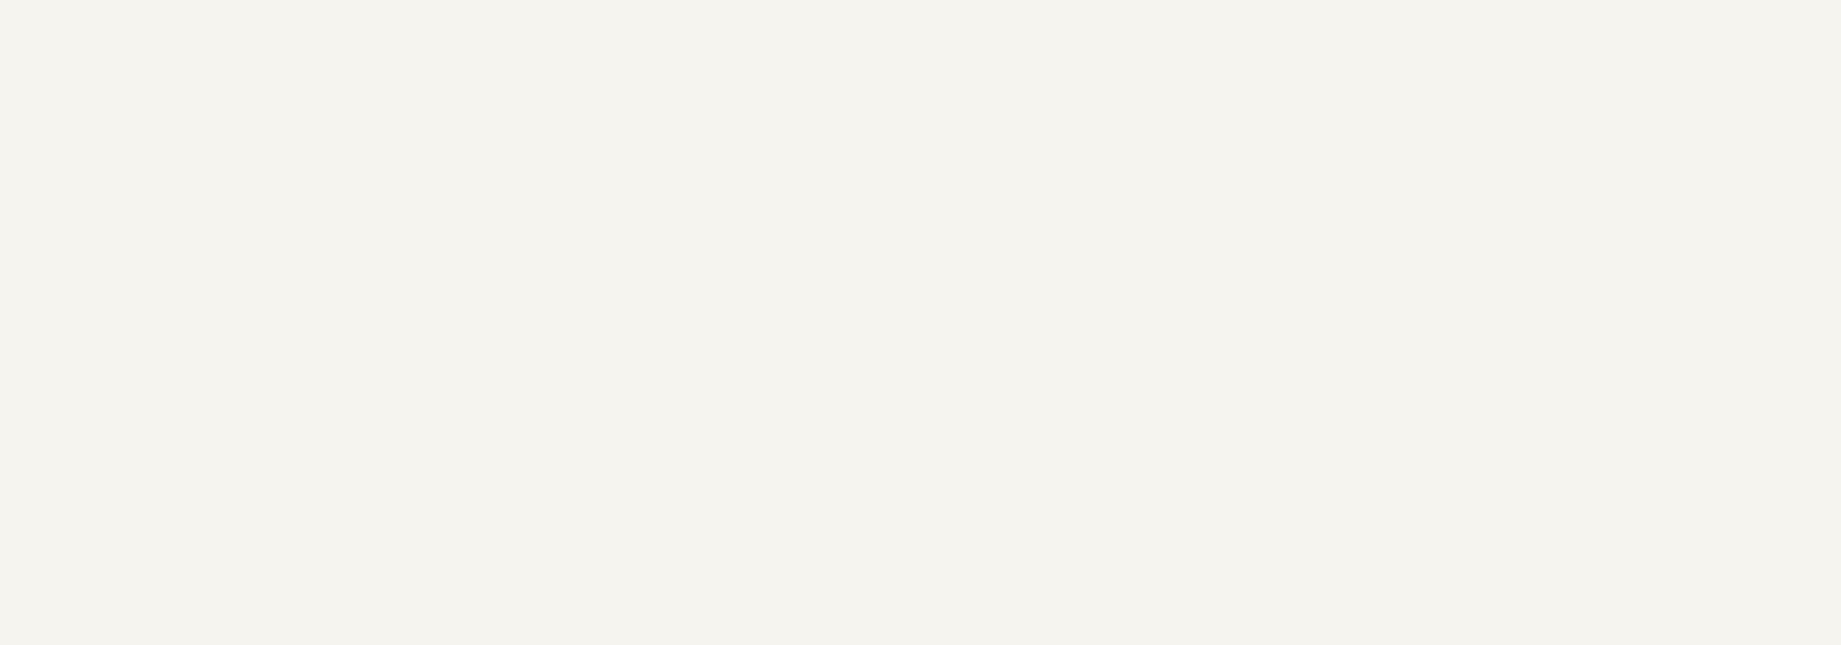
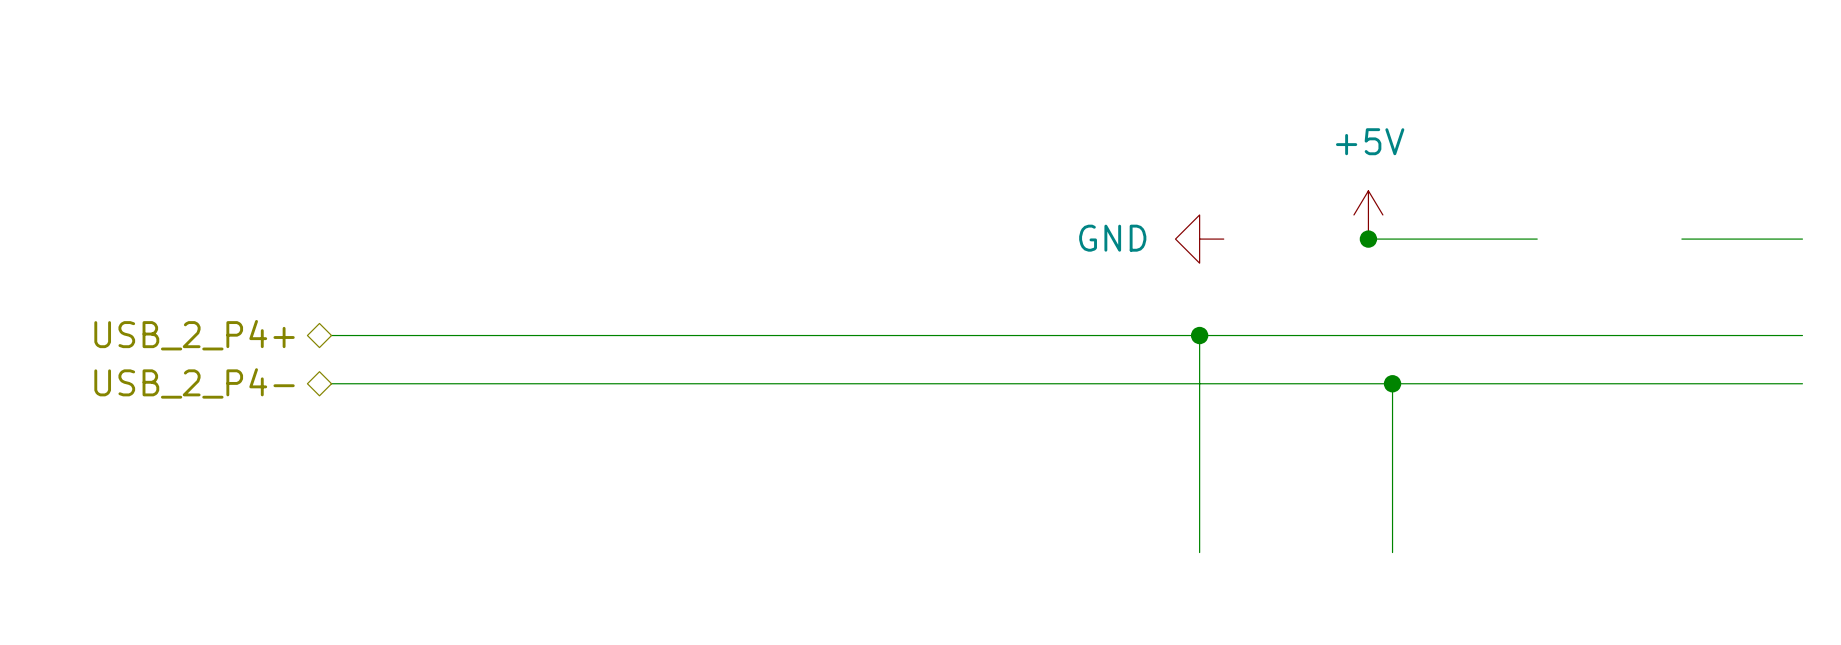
power symbol: none -> +5V (1368, 214)
power symbol: none -> GND (1199, 239)
wire: none -> (1368, 239) (1537, 239)
junction: none -> (1368, 239)
wire: none -> (1681, 239) (1802, 239)
hierarchical label: none -> USB_2_P4+ (194, 335)
wire: none -> (331, 335) (1802, 335)
wire: none -> (1199, 335) (1199, 552)
junction: none -> (1199, 335)
hierarchical label: none -> USB_2_P4- (194, 383)
wire: none -> (331, 383) (1802, 383)
wire: none -> (1392, 383) (1392, 552)
junction: none -> (1392, 383)

